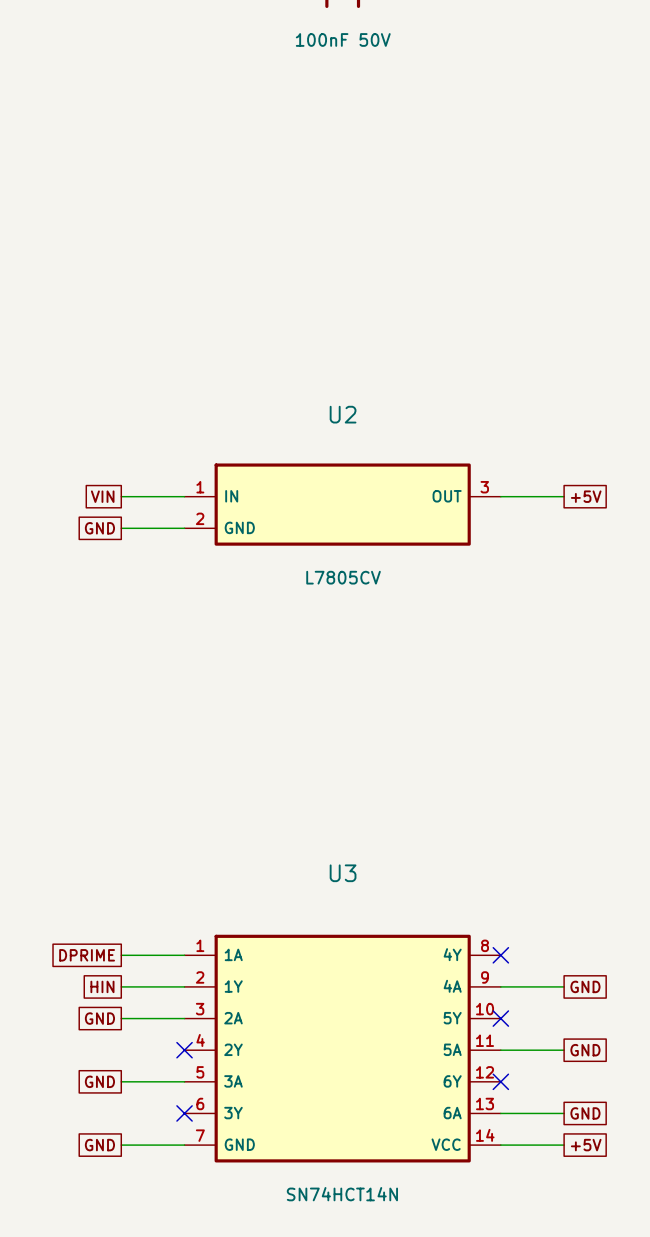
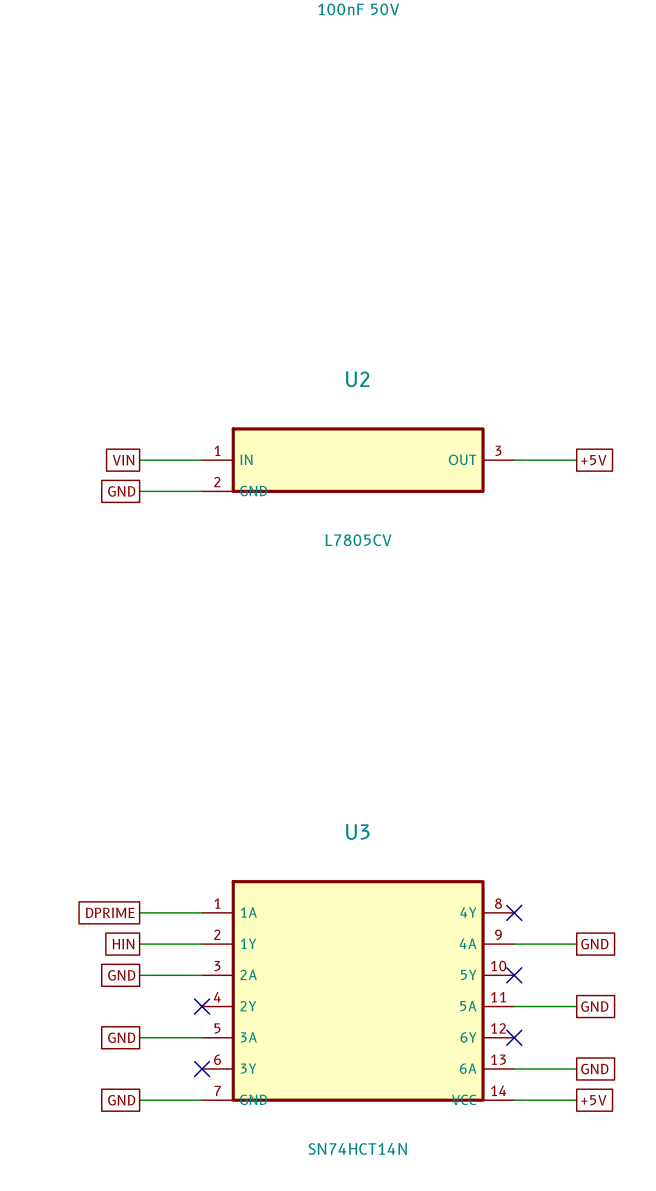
U2 symbol: [184, 463, 501, 546] -> [202, 427, 515, 493]
U3 symbol: [184, 934, 501, 1163] -> [202, 880, 515, 1102]

